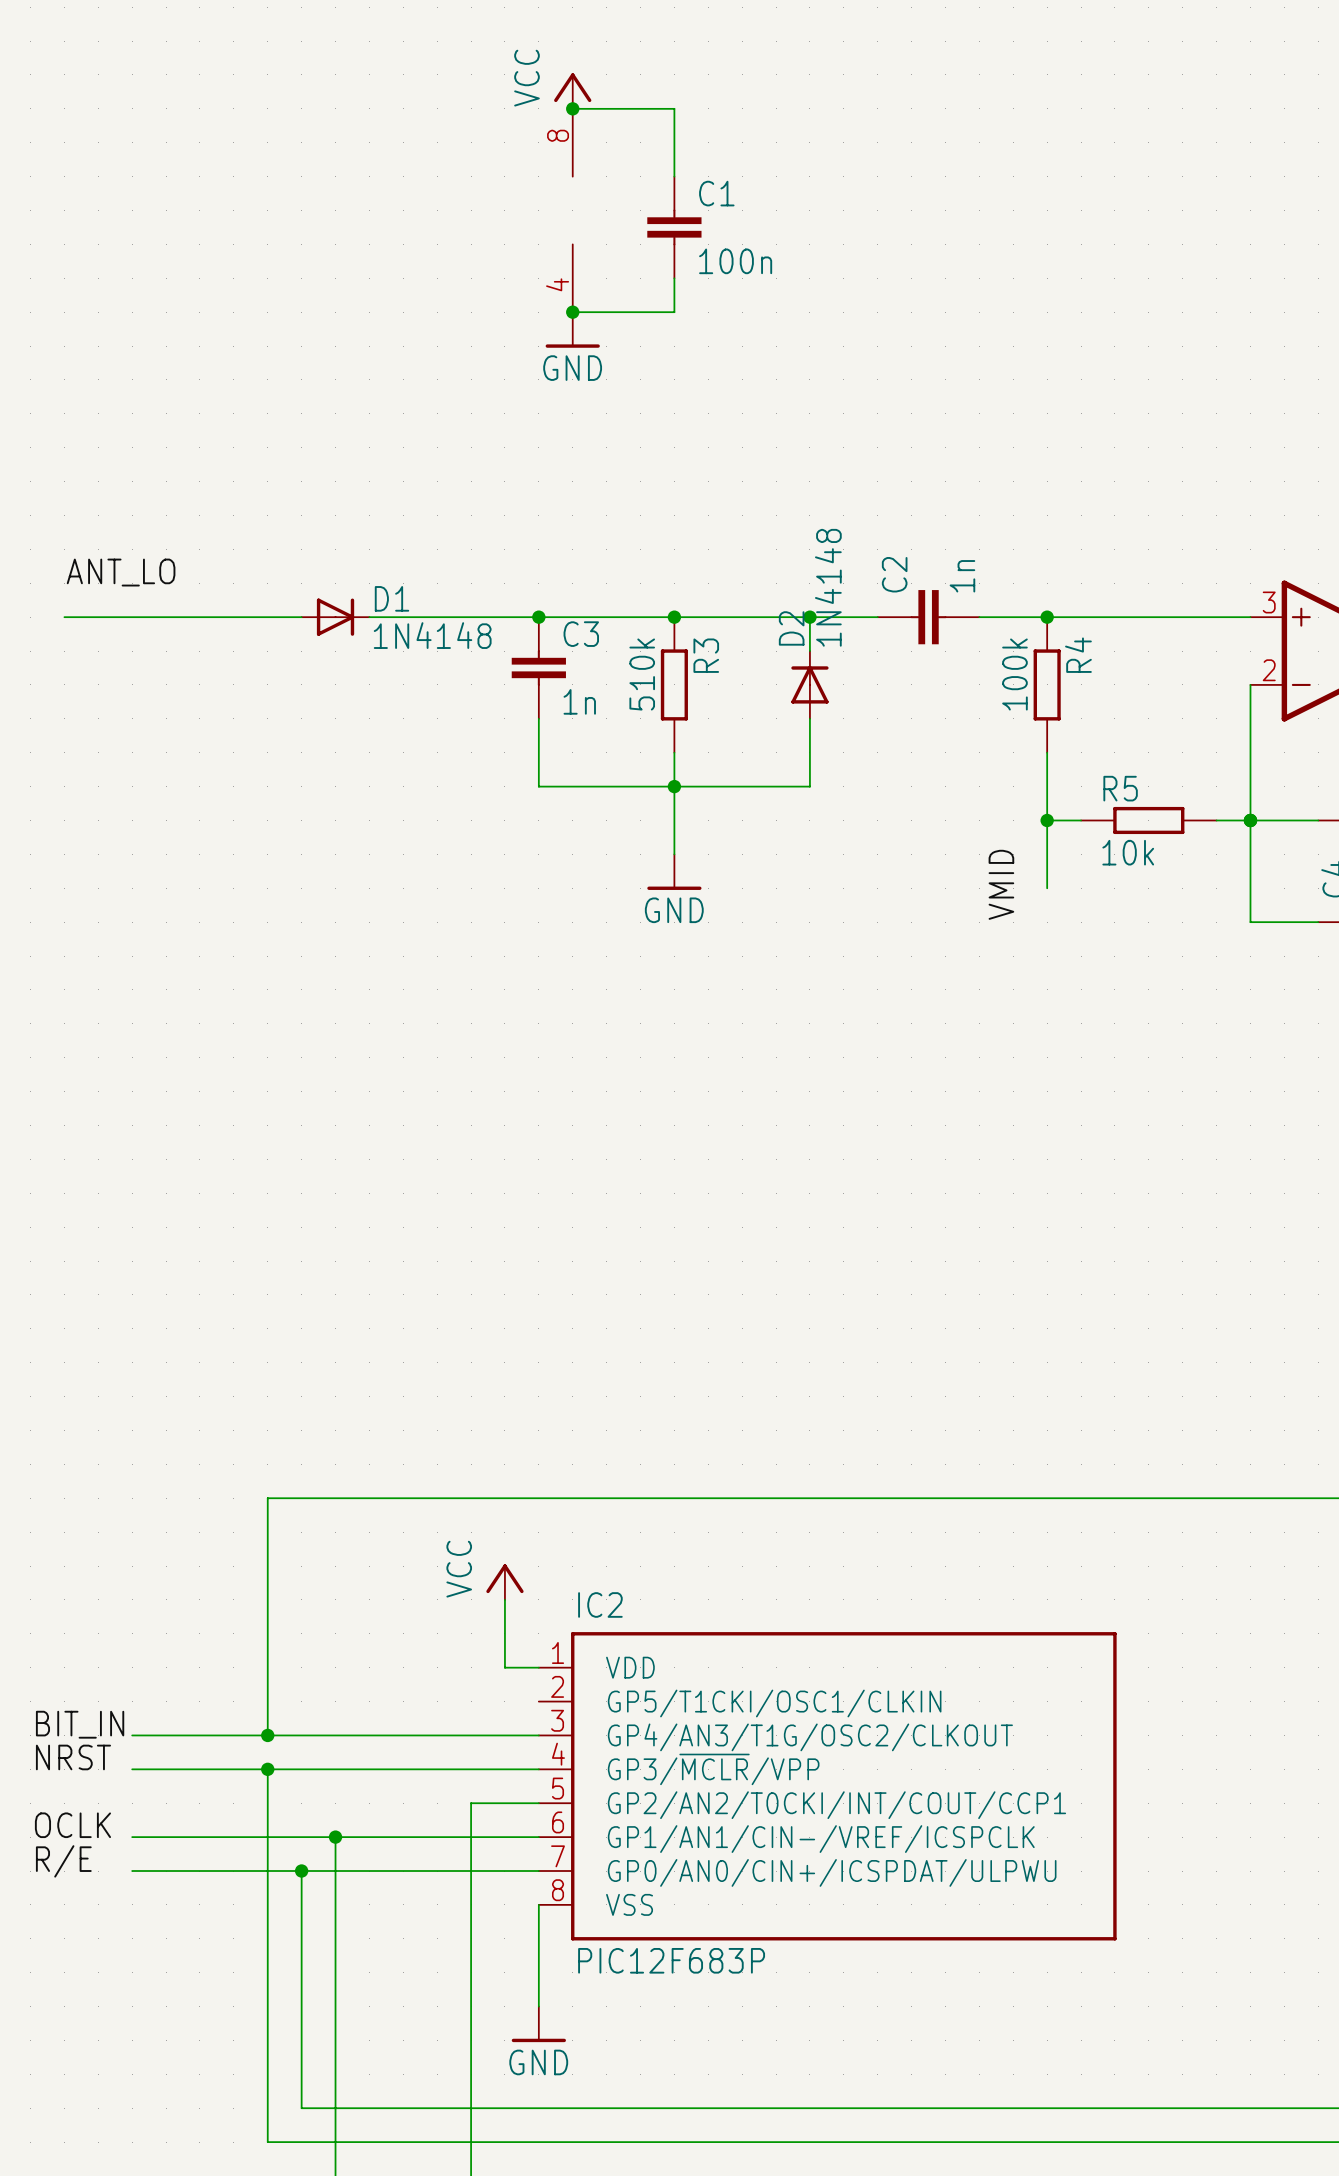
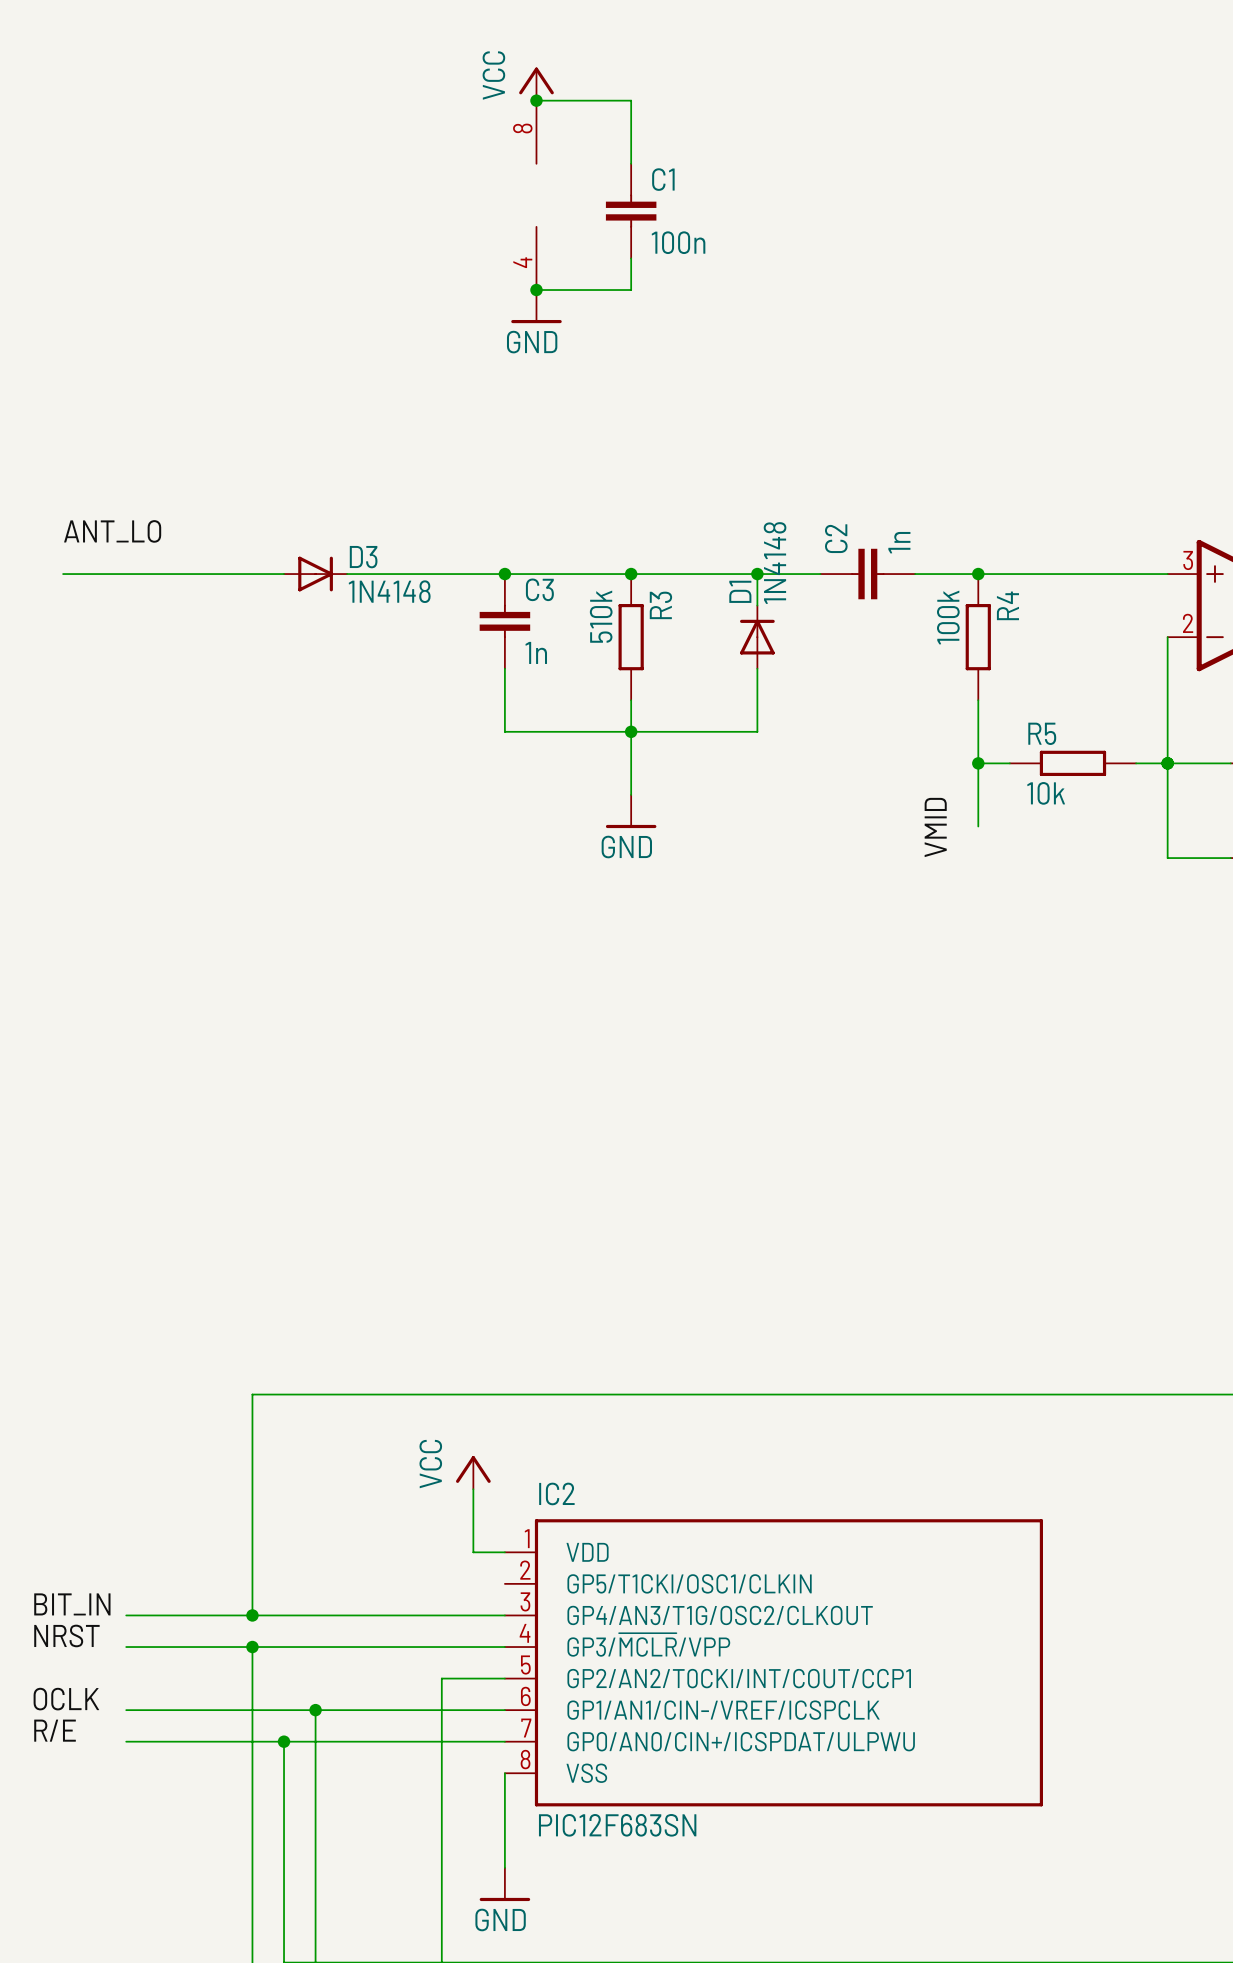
D1 name: D1 (392, 598) -> D3 (363, 557)
D2 name: D2 (791, 628) -> D1 (740, 591)
IC2 value: PIC12F683P (671, 1960) -> PIC12F683SN (617, 1825)

